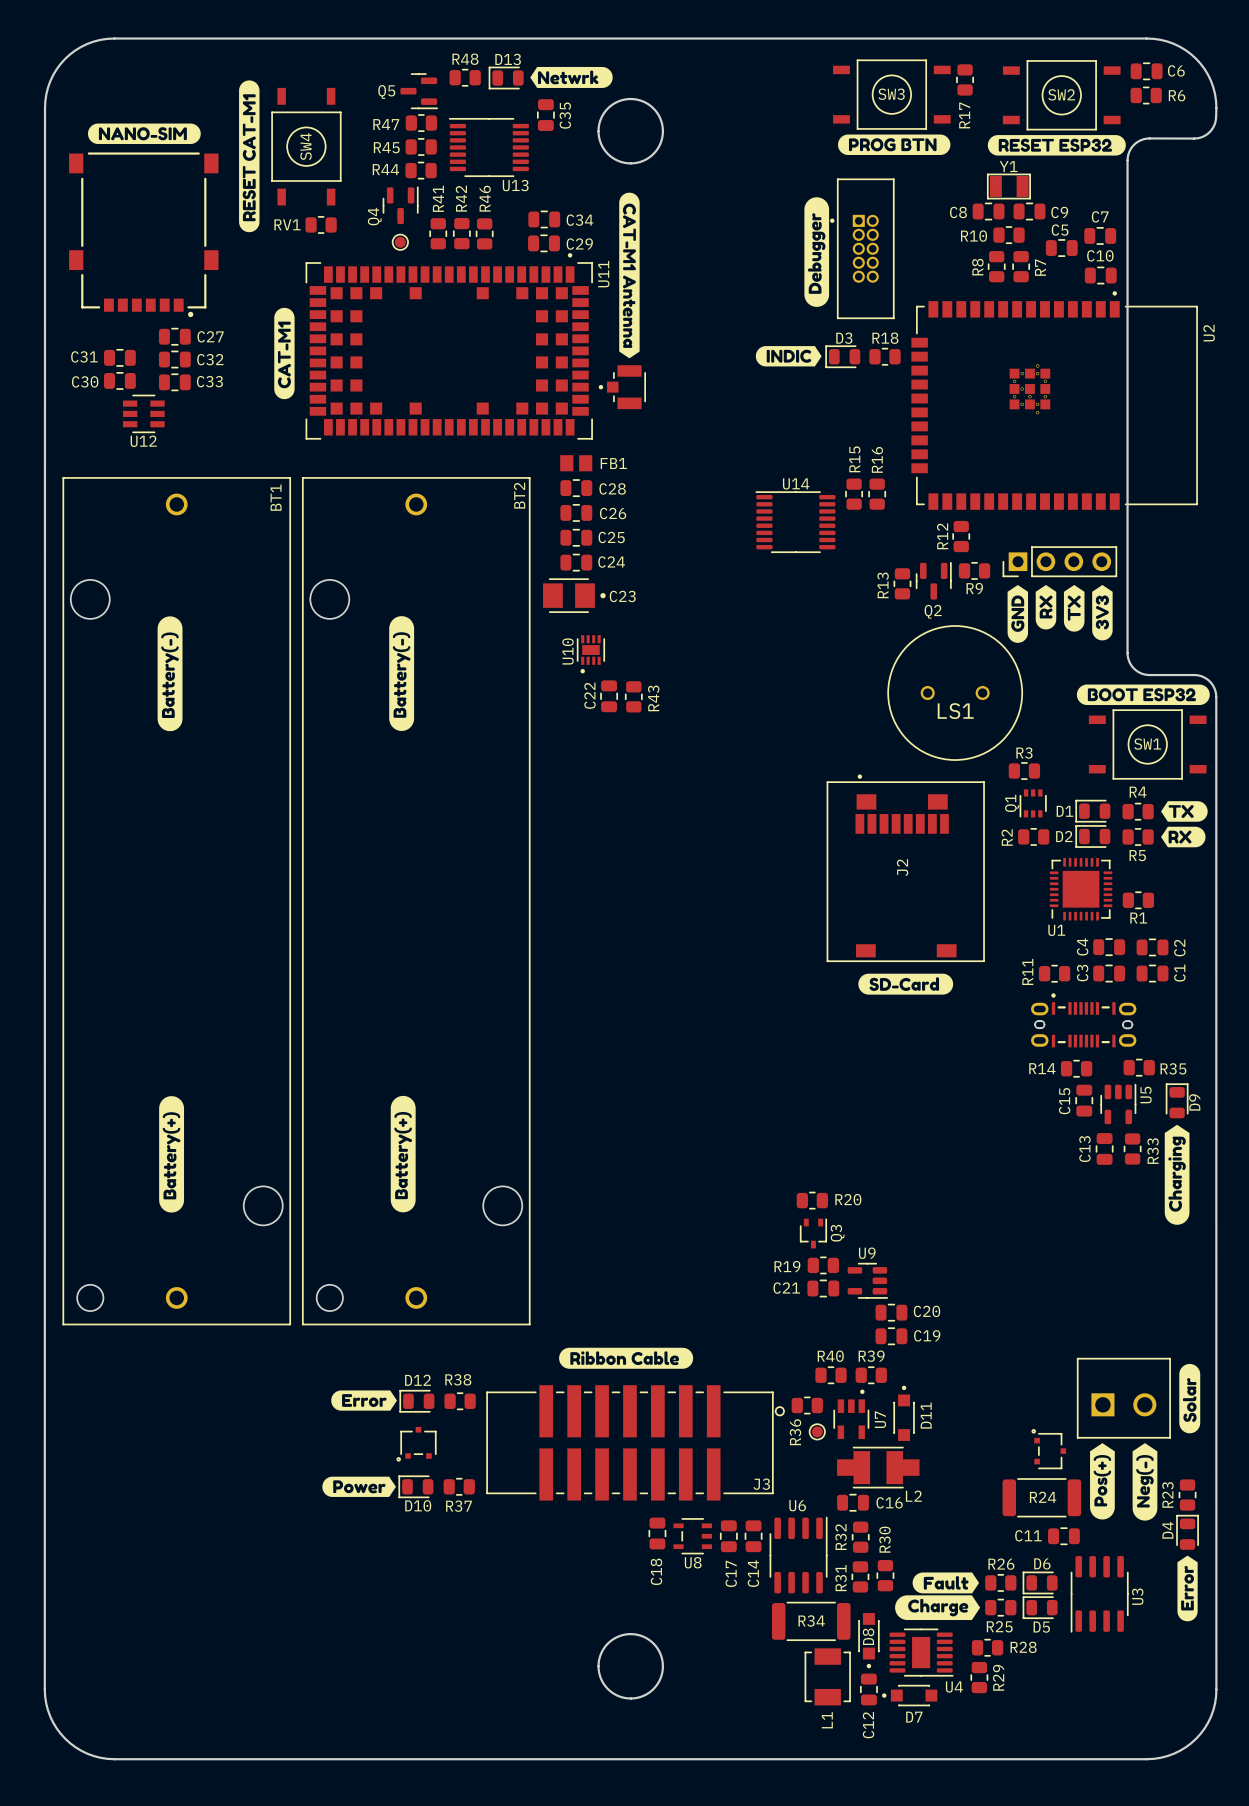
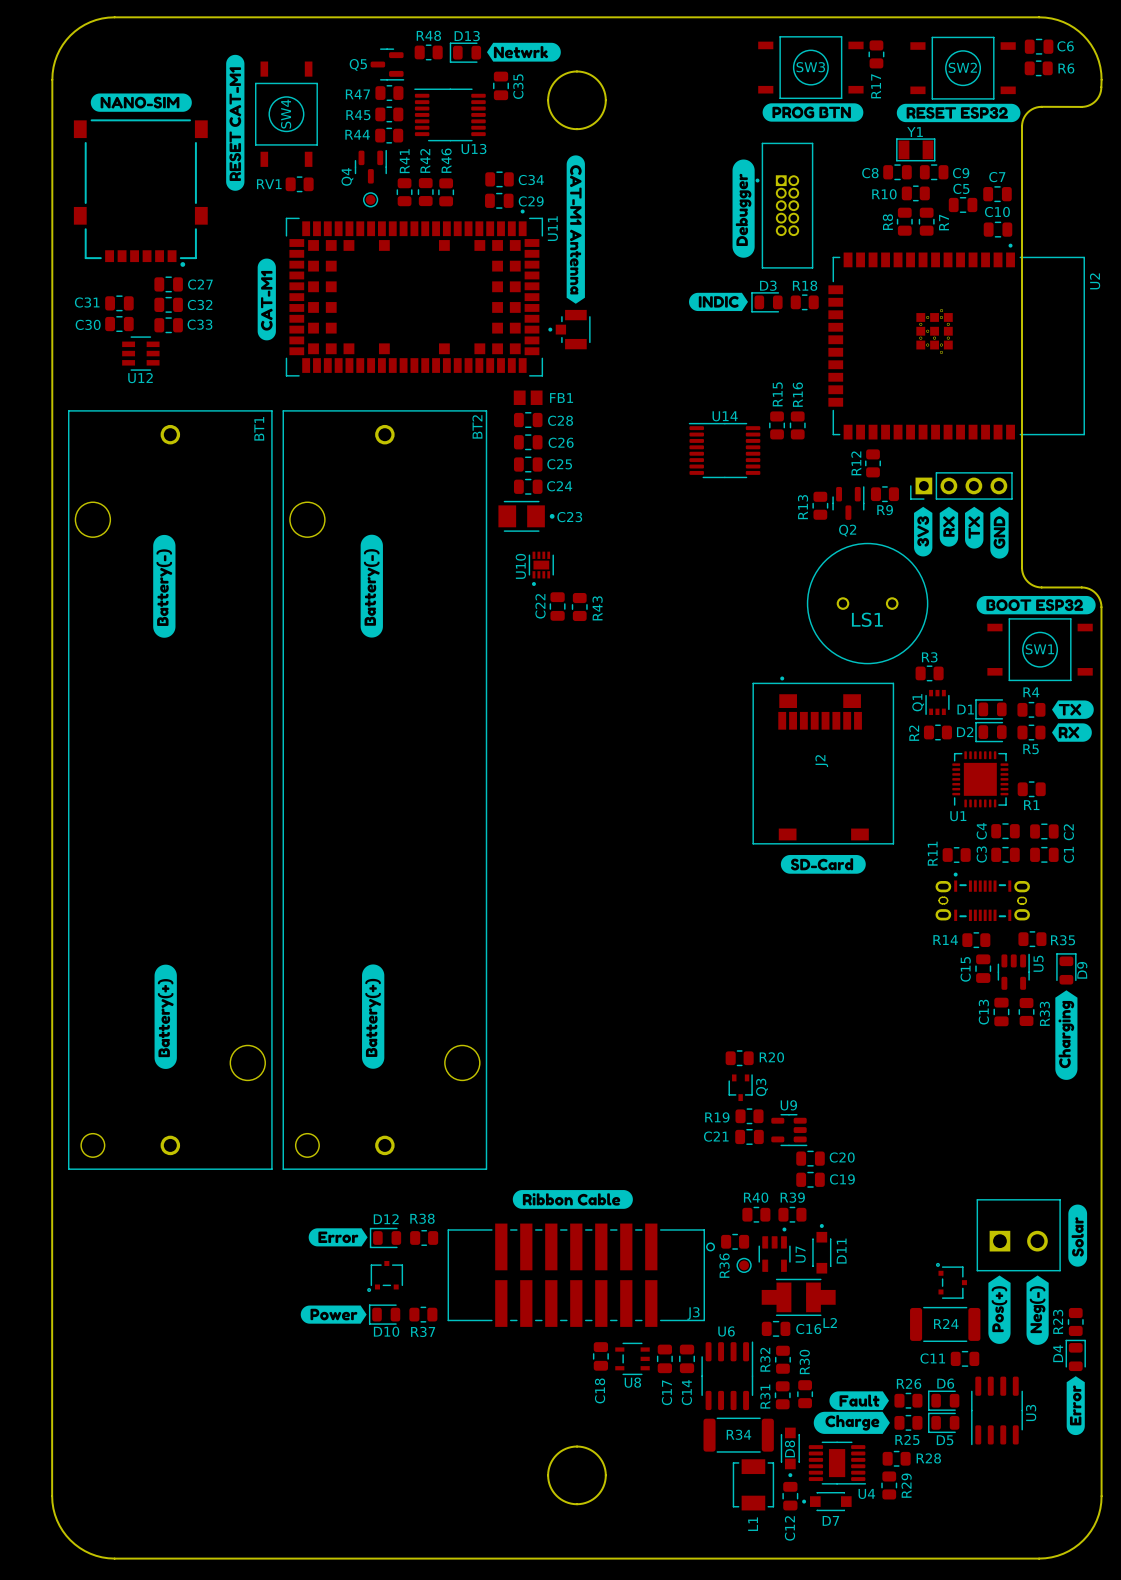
drawing position: (1102, 612) -> (923, 531)
drawing position: (1017, 613) -> (999, 532)

